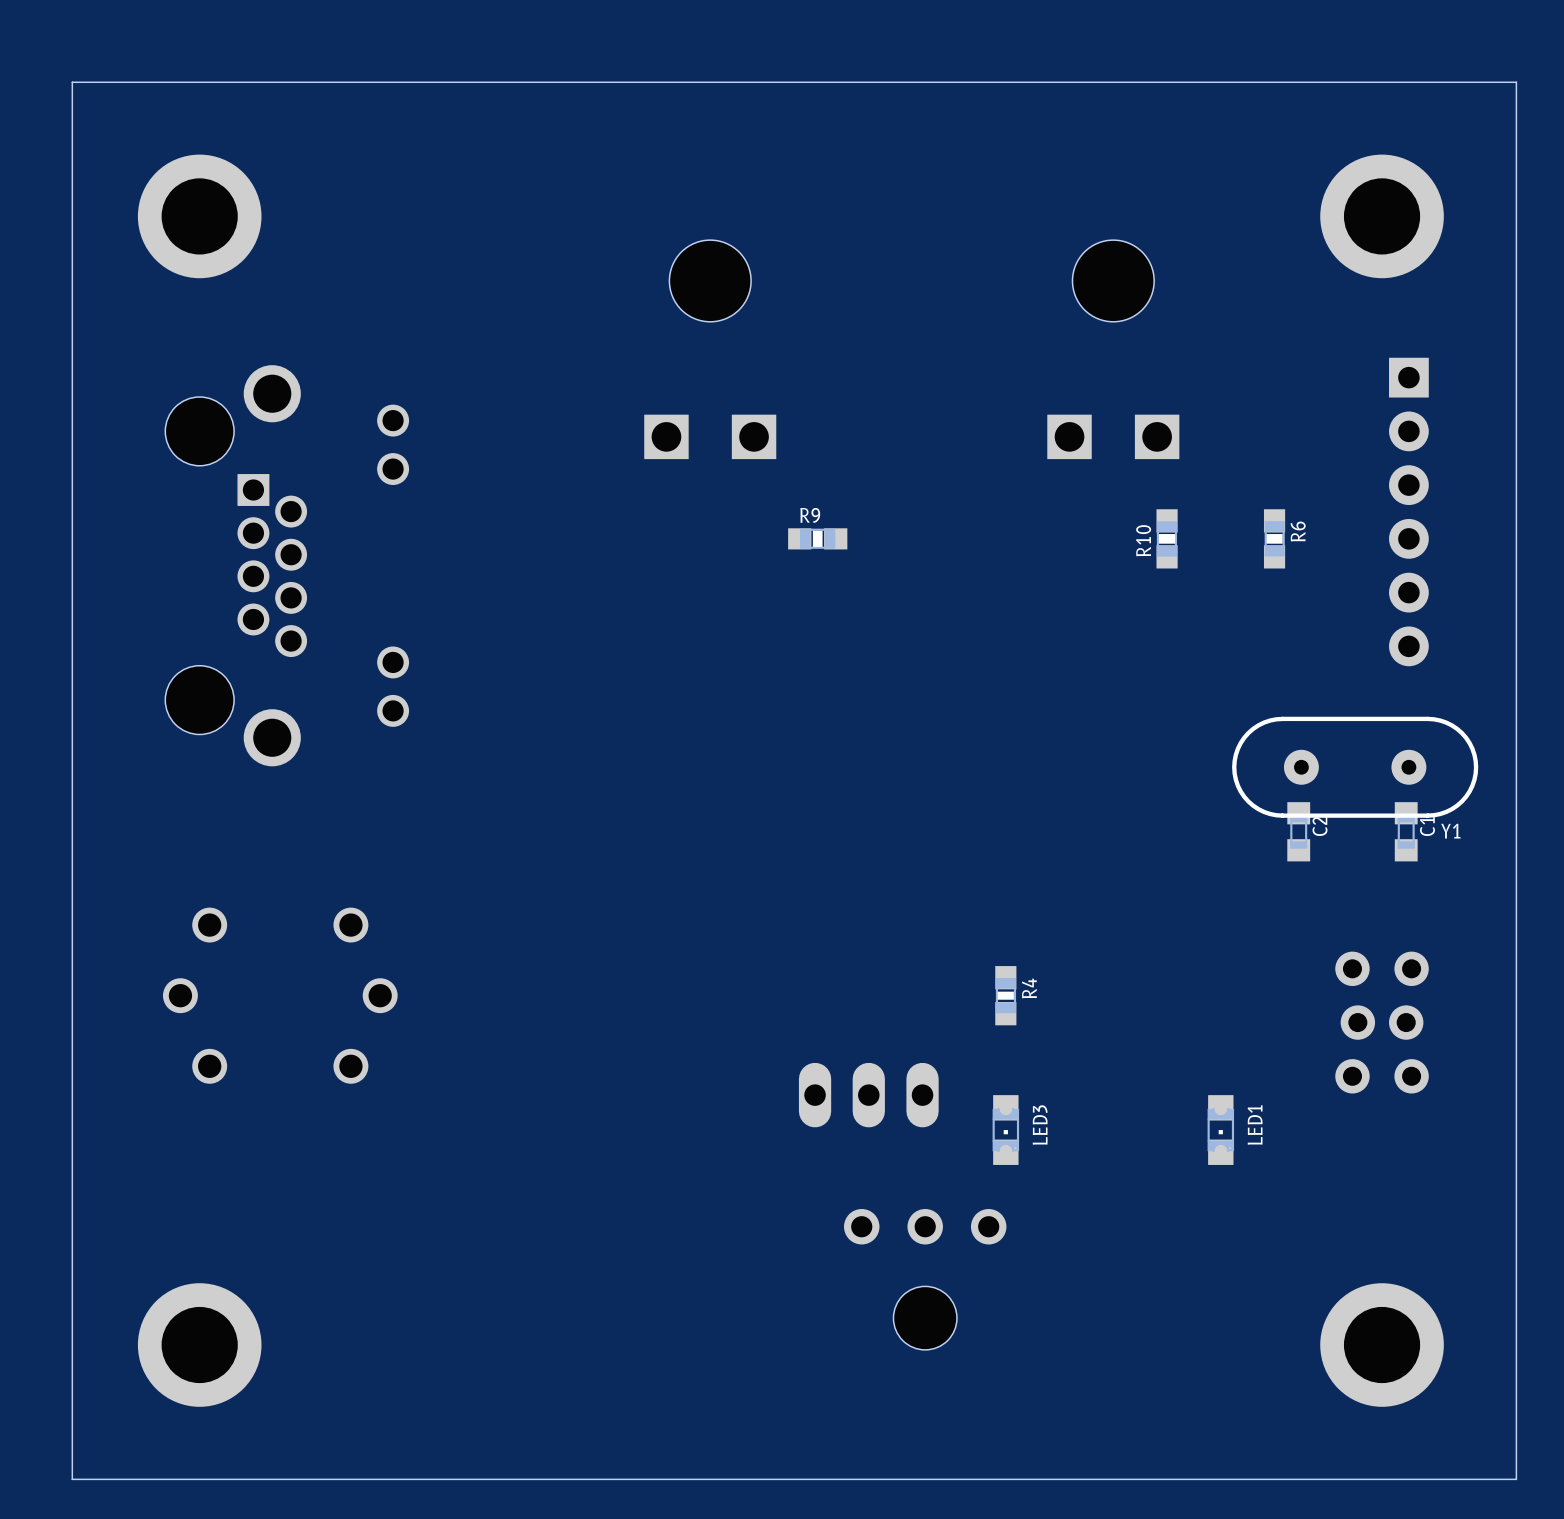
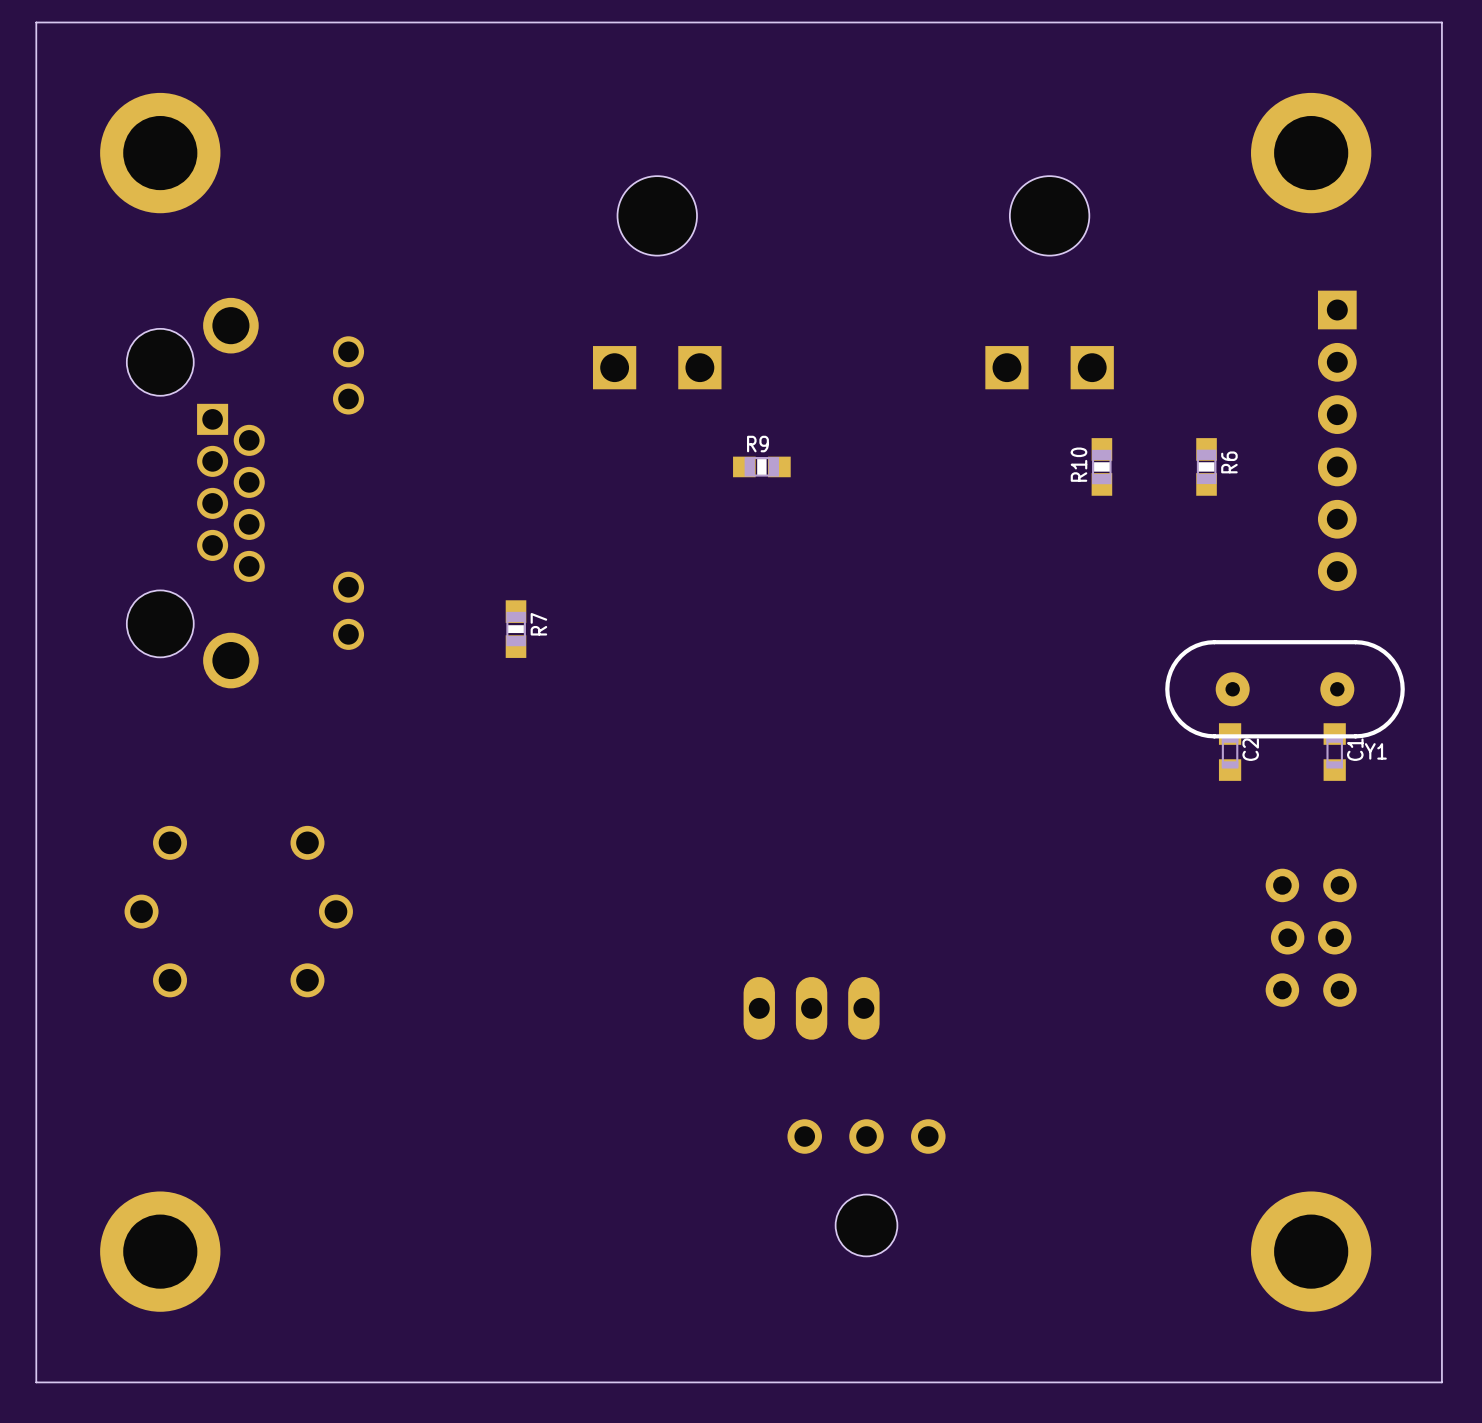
R7: none -> (516, 629)
R4: (1005, 995) -> none
LED3: (1005, 1130) -> none
LED1: (1220, 1130) -> none

